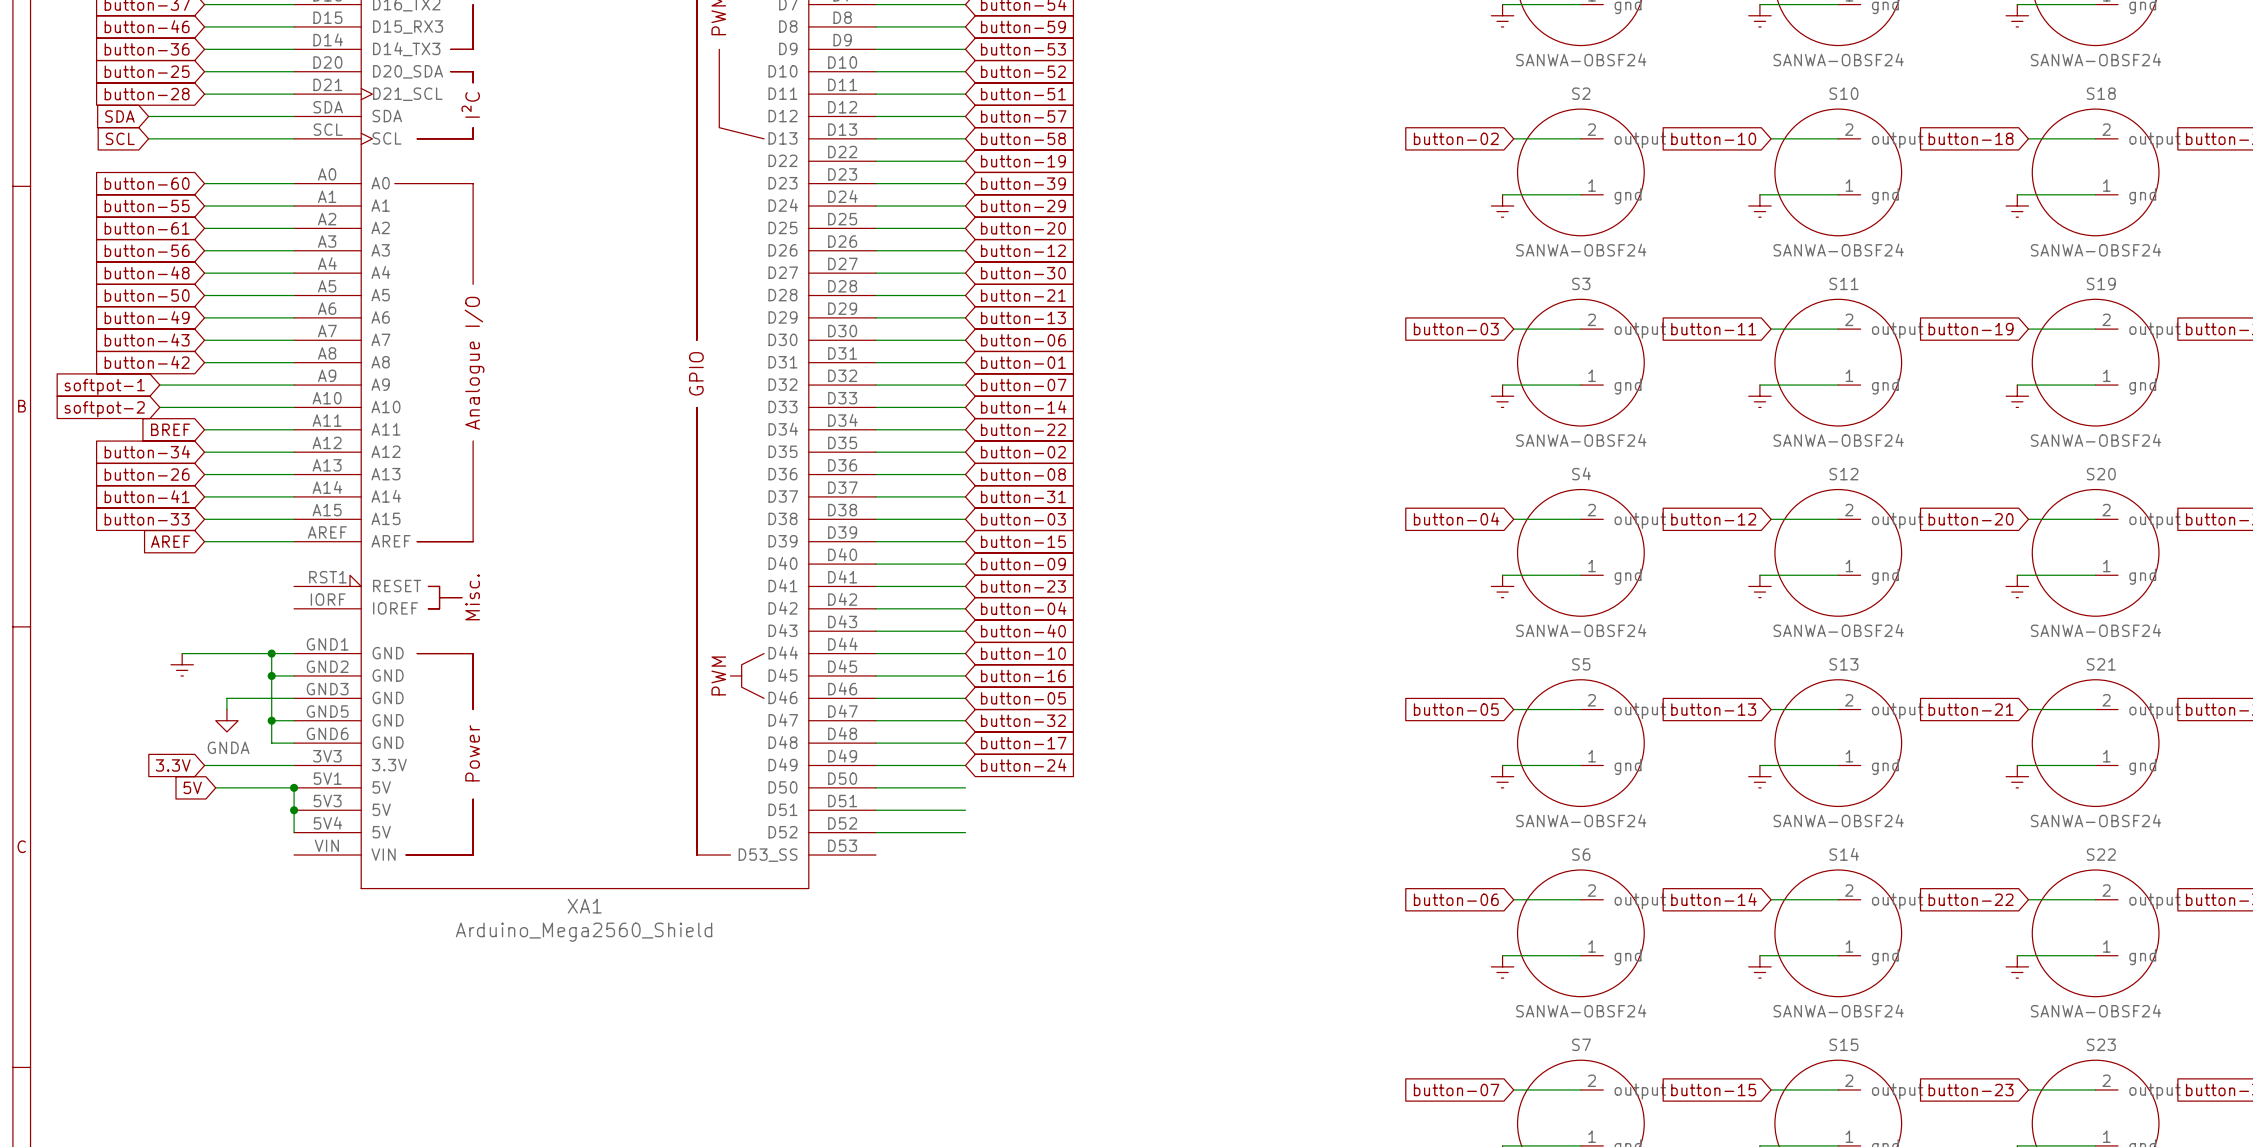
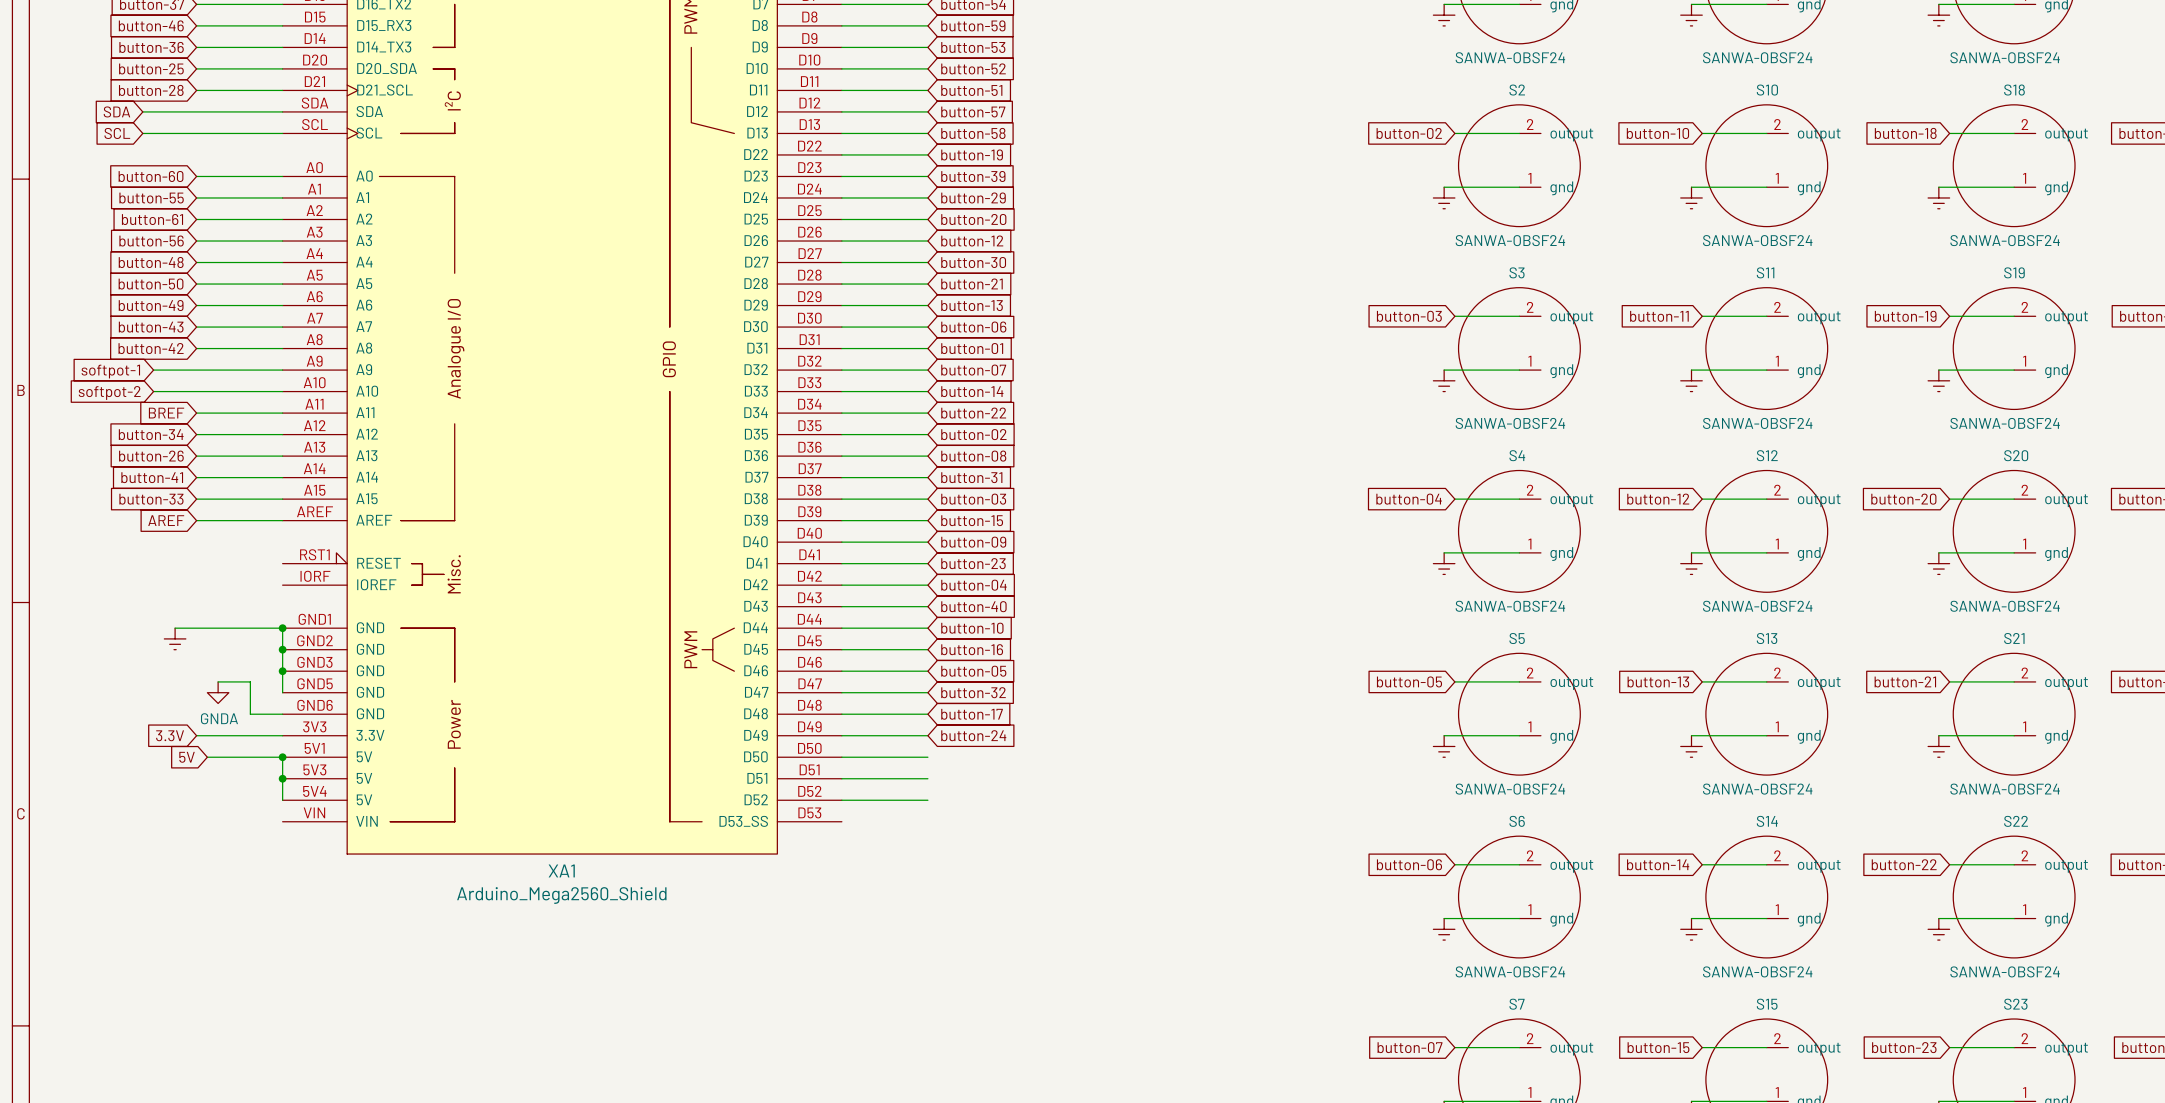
wire: (271, 653) (271, 743) -> none
junction: (271, 653) -> none
junction: none -> (282, 628)
wire: (271, 675) (294, 675) -> none
junction: (271, 675) -> none
junction: none -> (282, 649)
wire: (294, 698) (226, 698) (226, 709) -> (261, 714) (250, 714) (250, 681) (218, 681)
junction: none -> (282, 671)
wire: (271, 720) (294, 720) -> (282, 628) (282, 692)
junction: (271, 720) -> none

